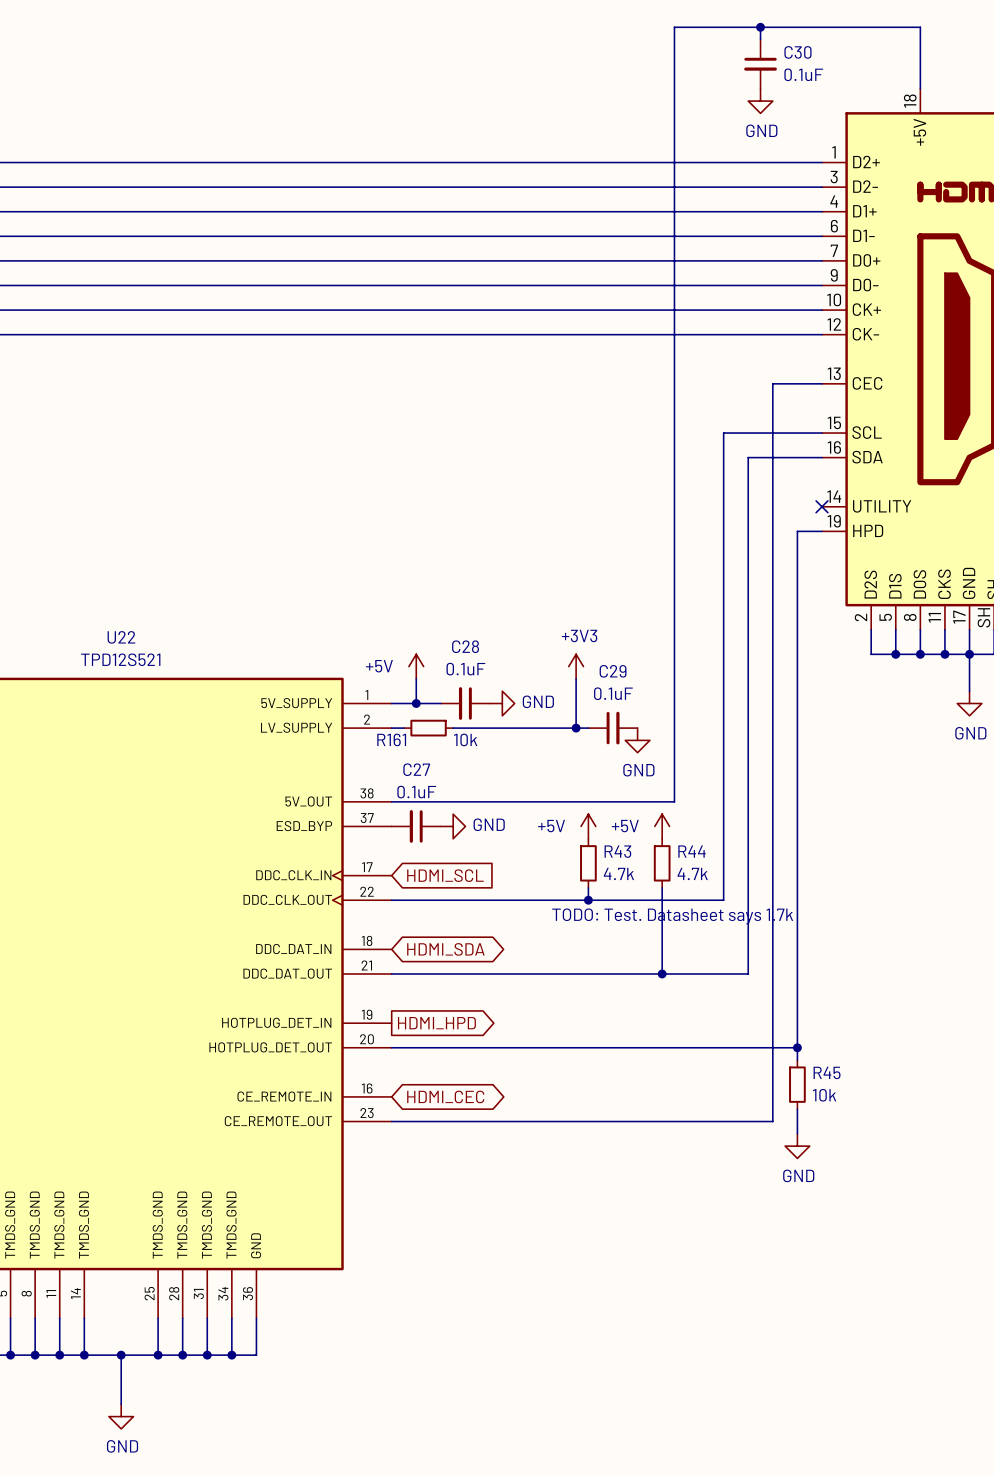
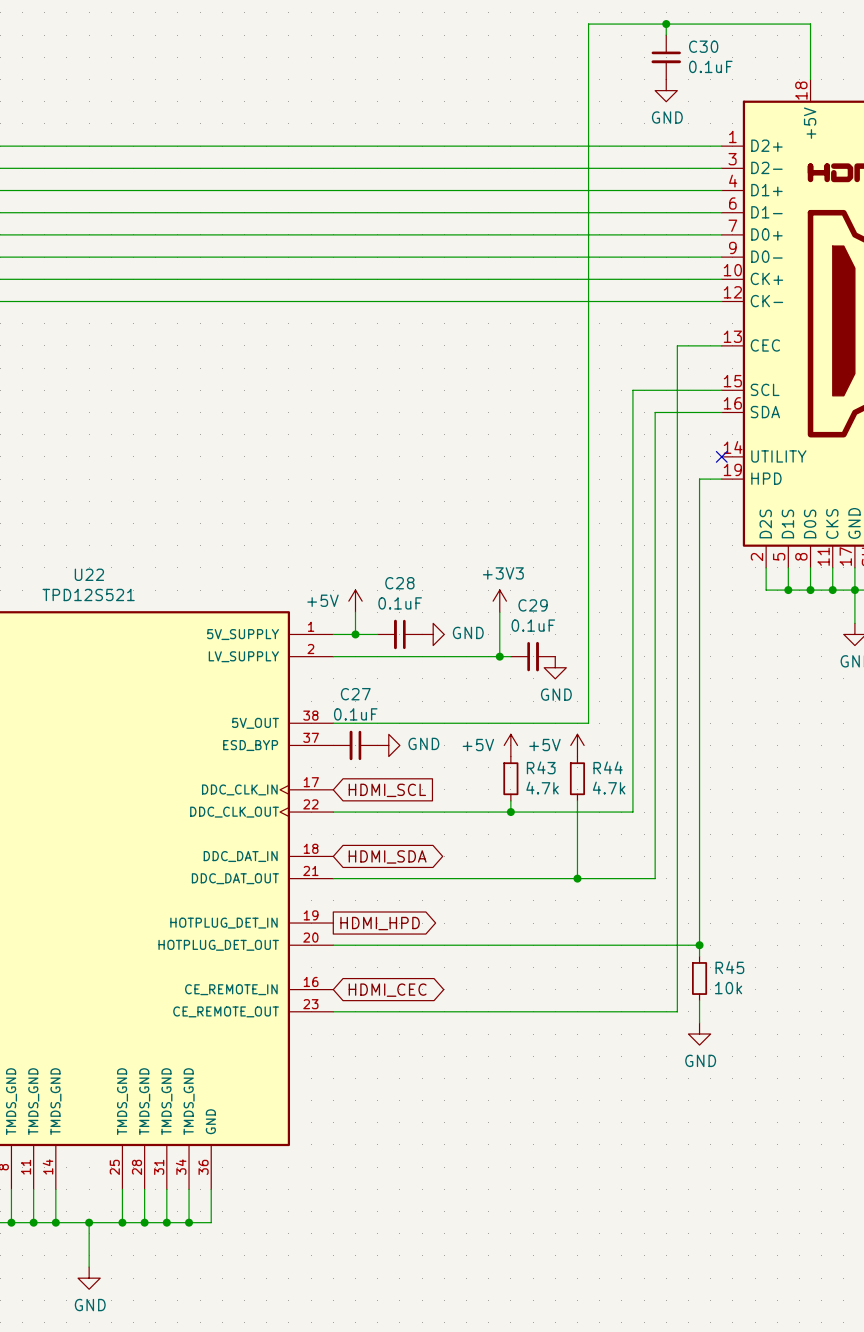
wire: none -> (344, 656) (388, 656)
R161: 10k (428, 728) -> none
text: TODO: Test. Datasheet says 1.7k (672, 916) -> none

